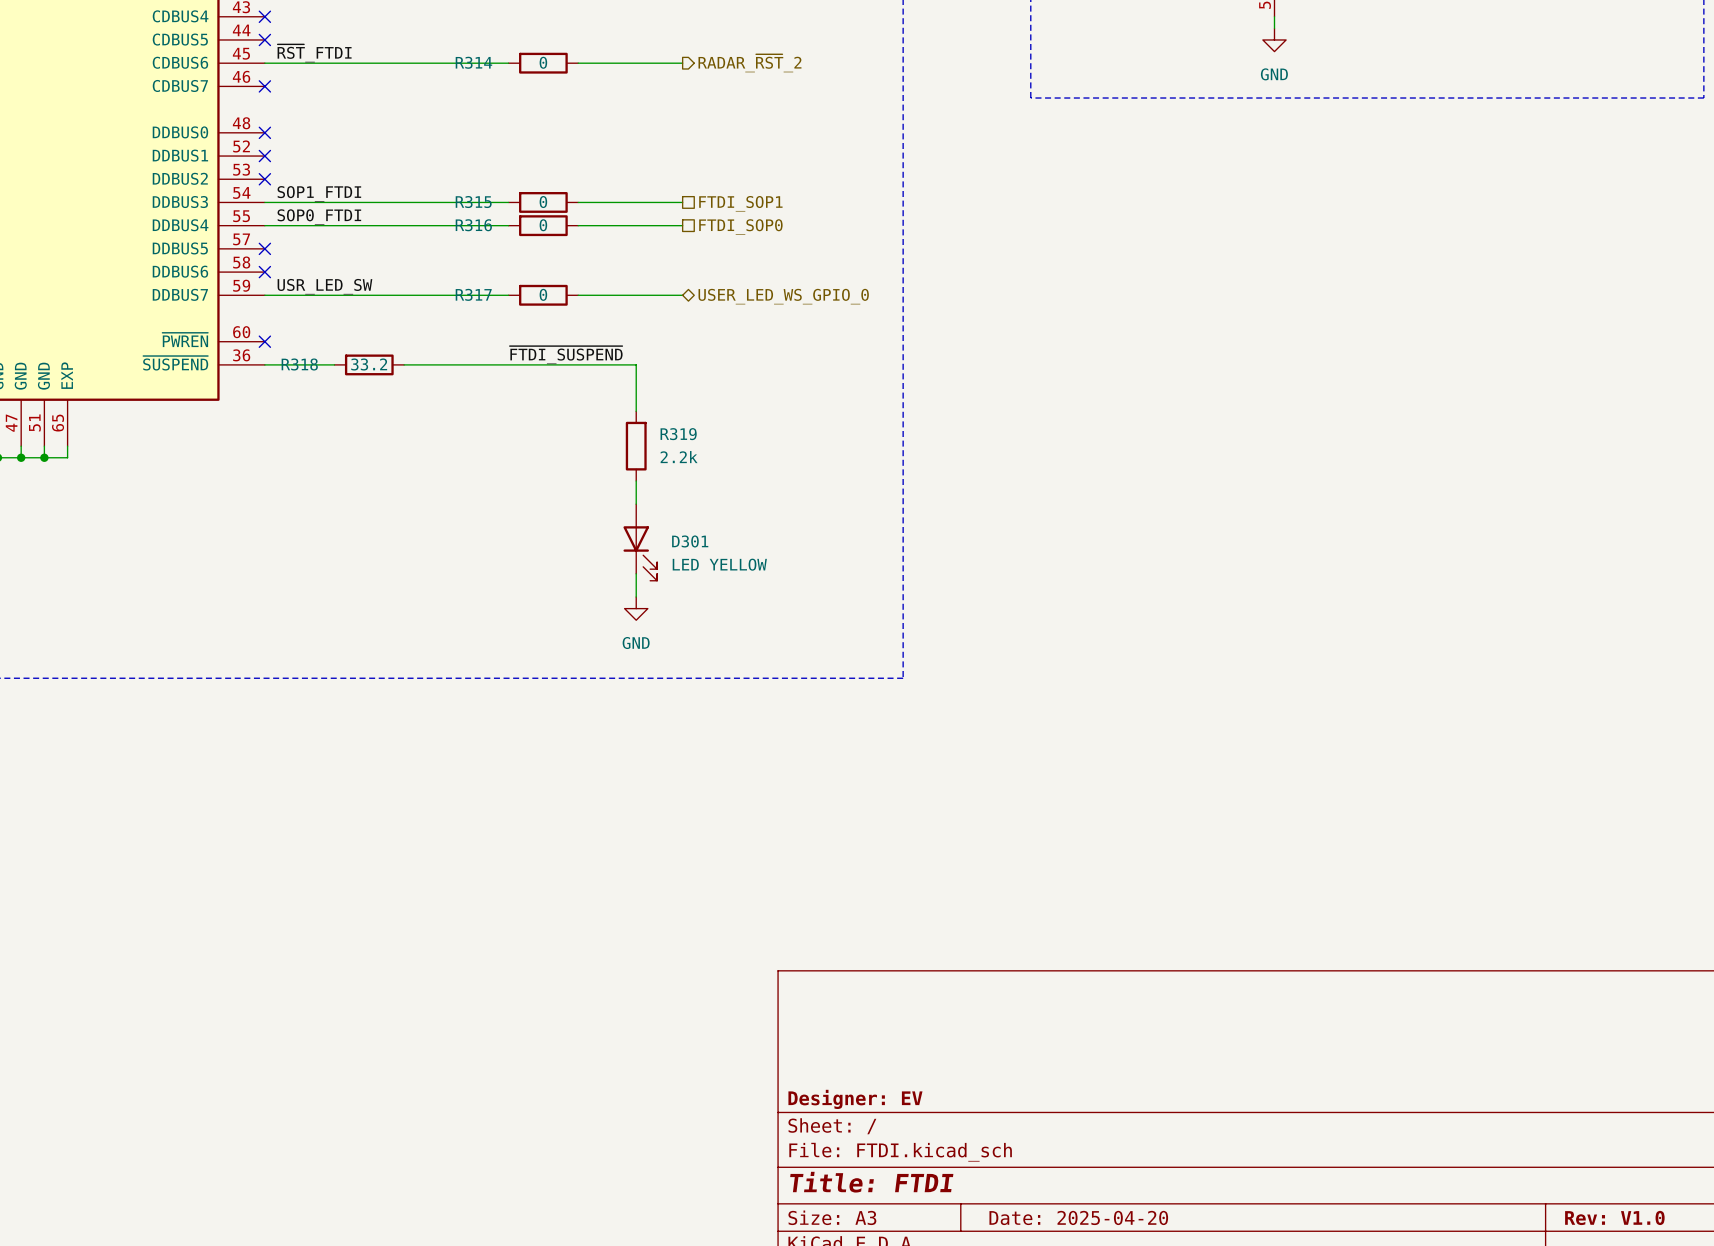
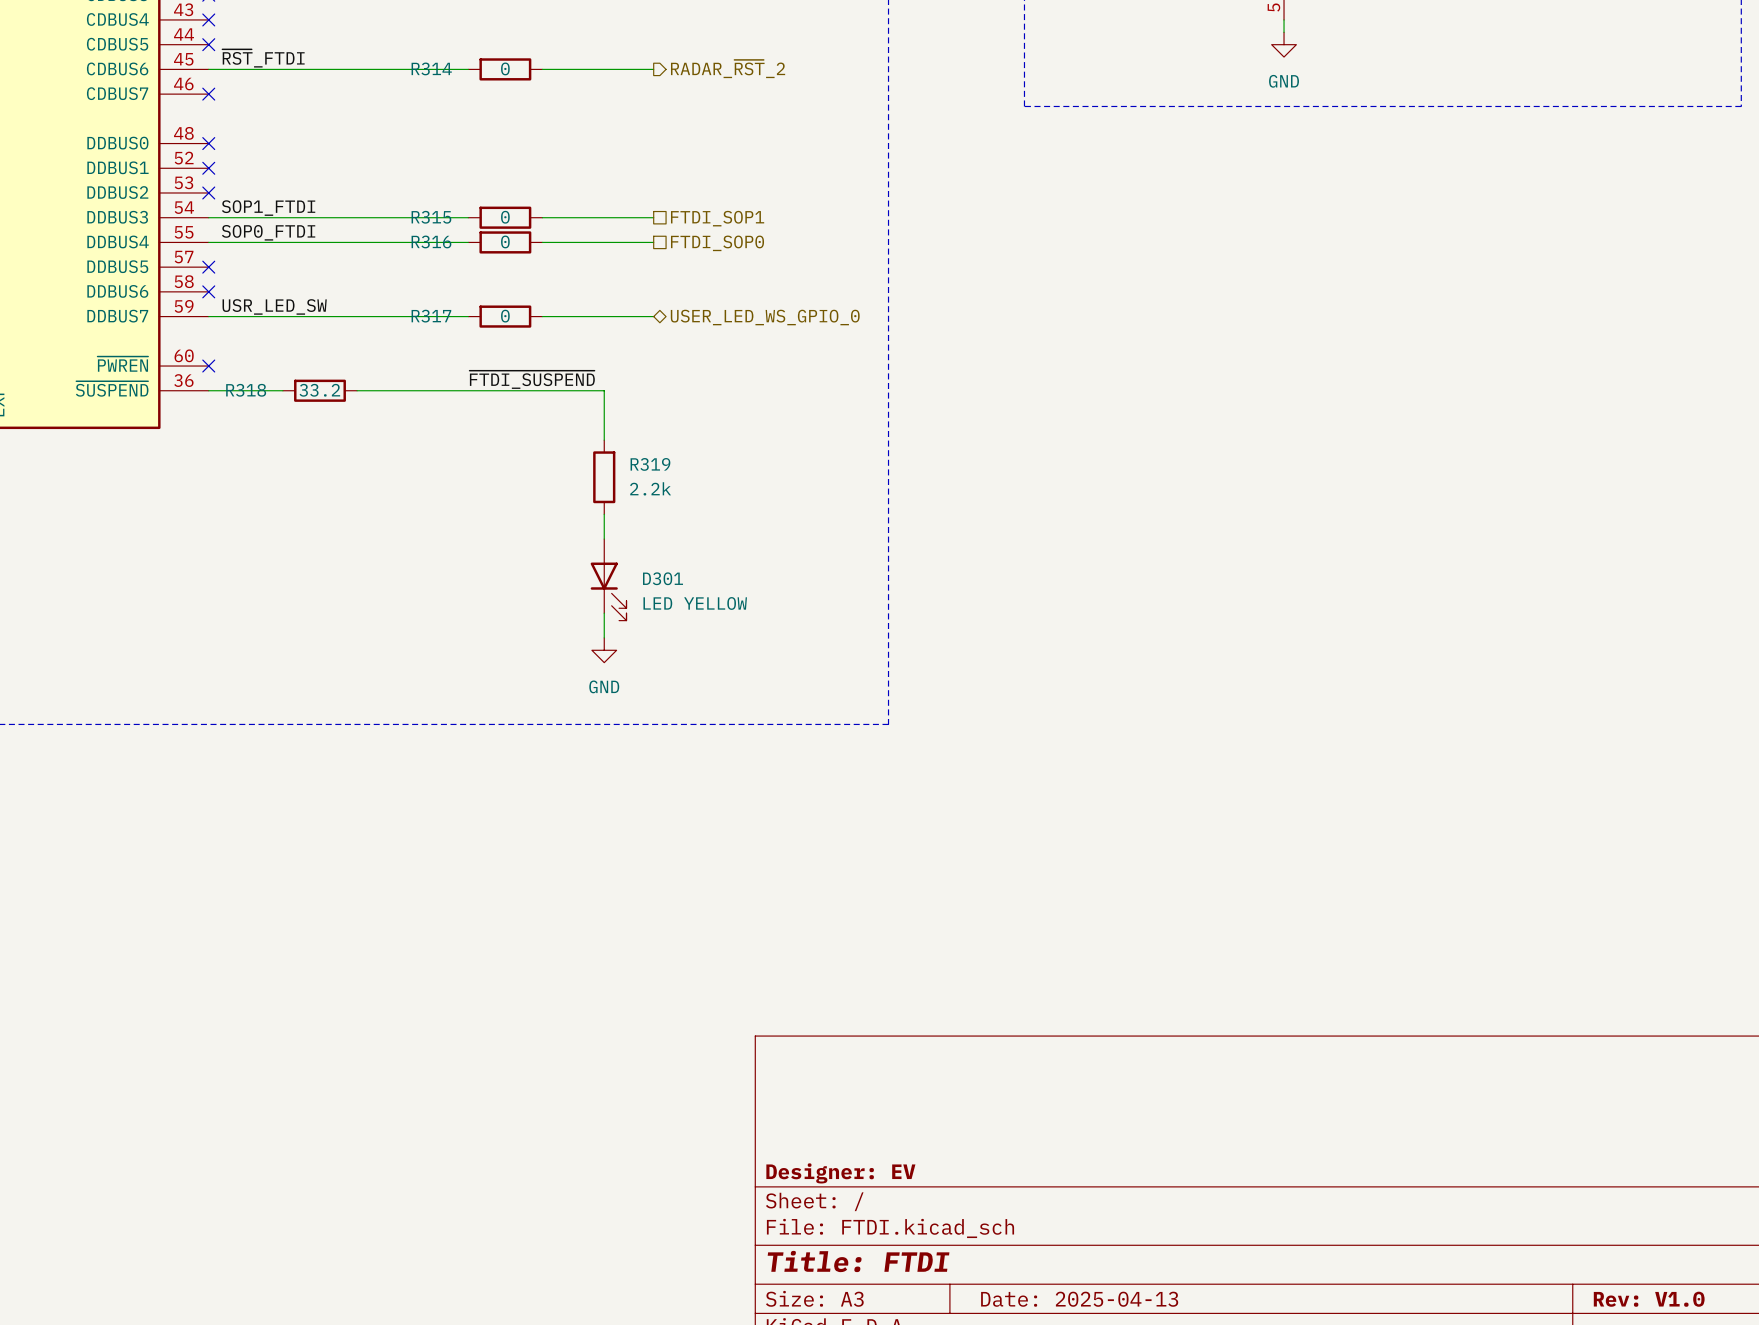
title block: Date: 2025-04-20 (1078, 1217) -> Date: 2025-04-13 (1079, 1299)

